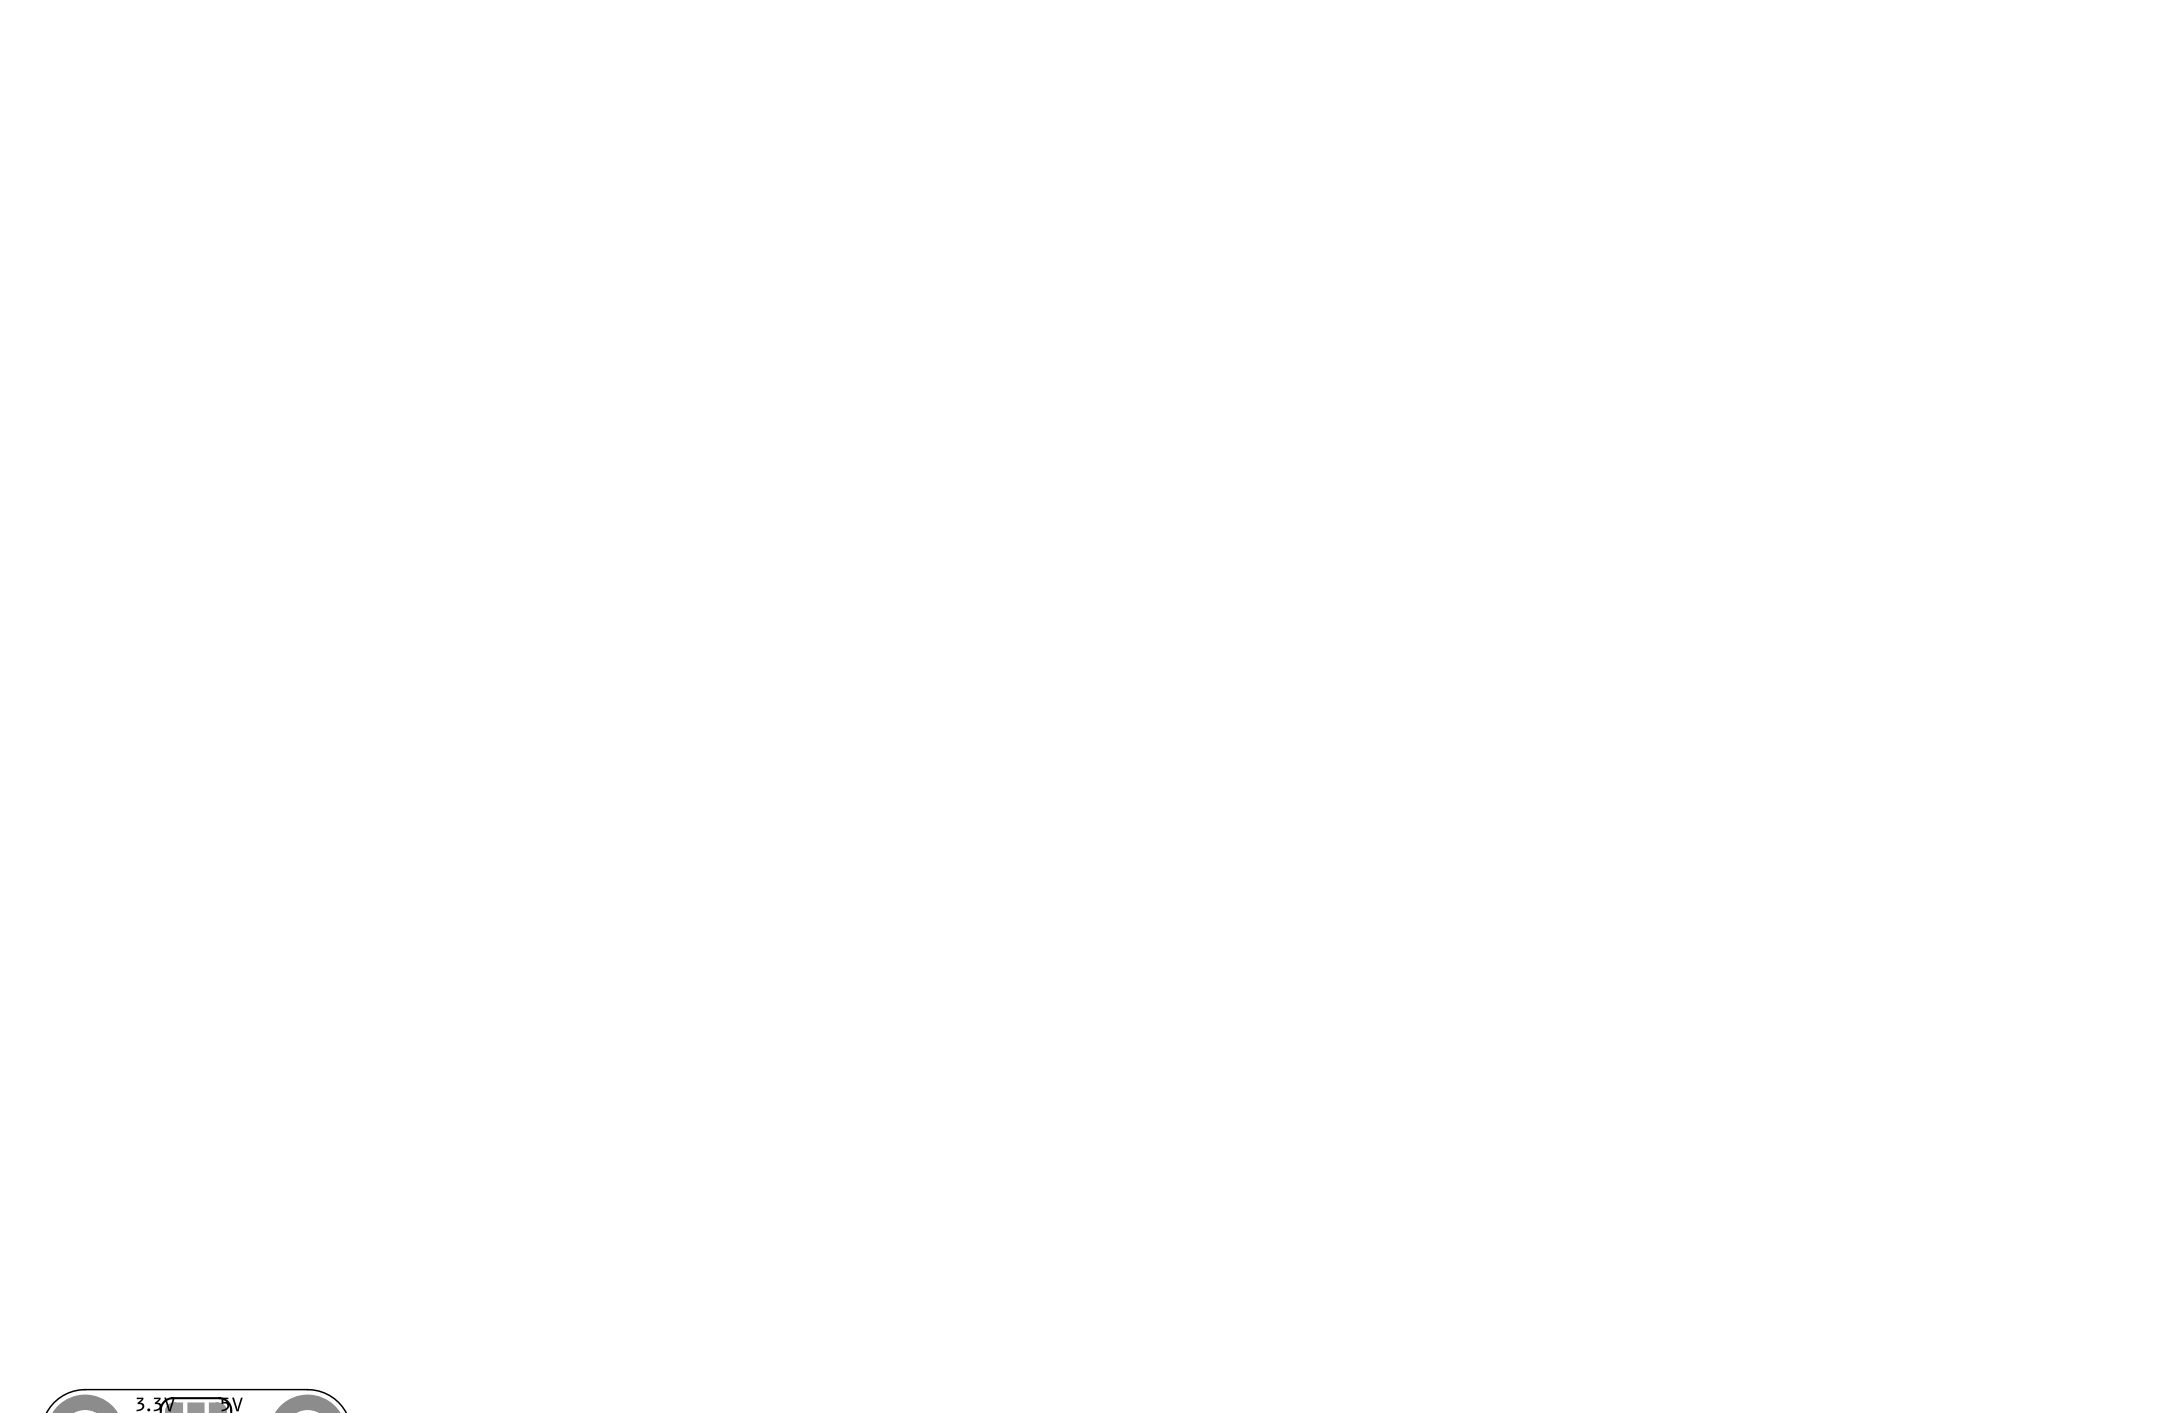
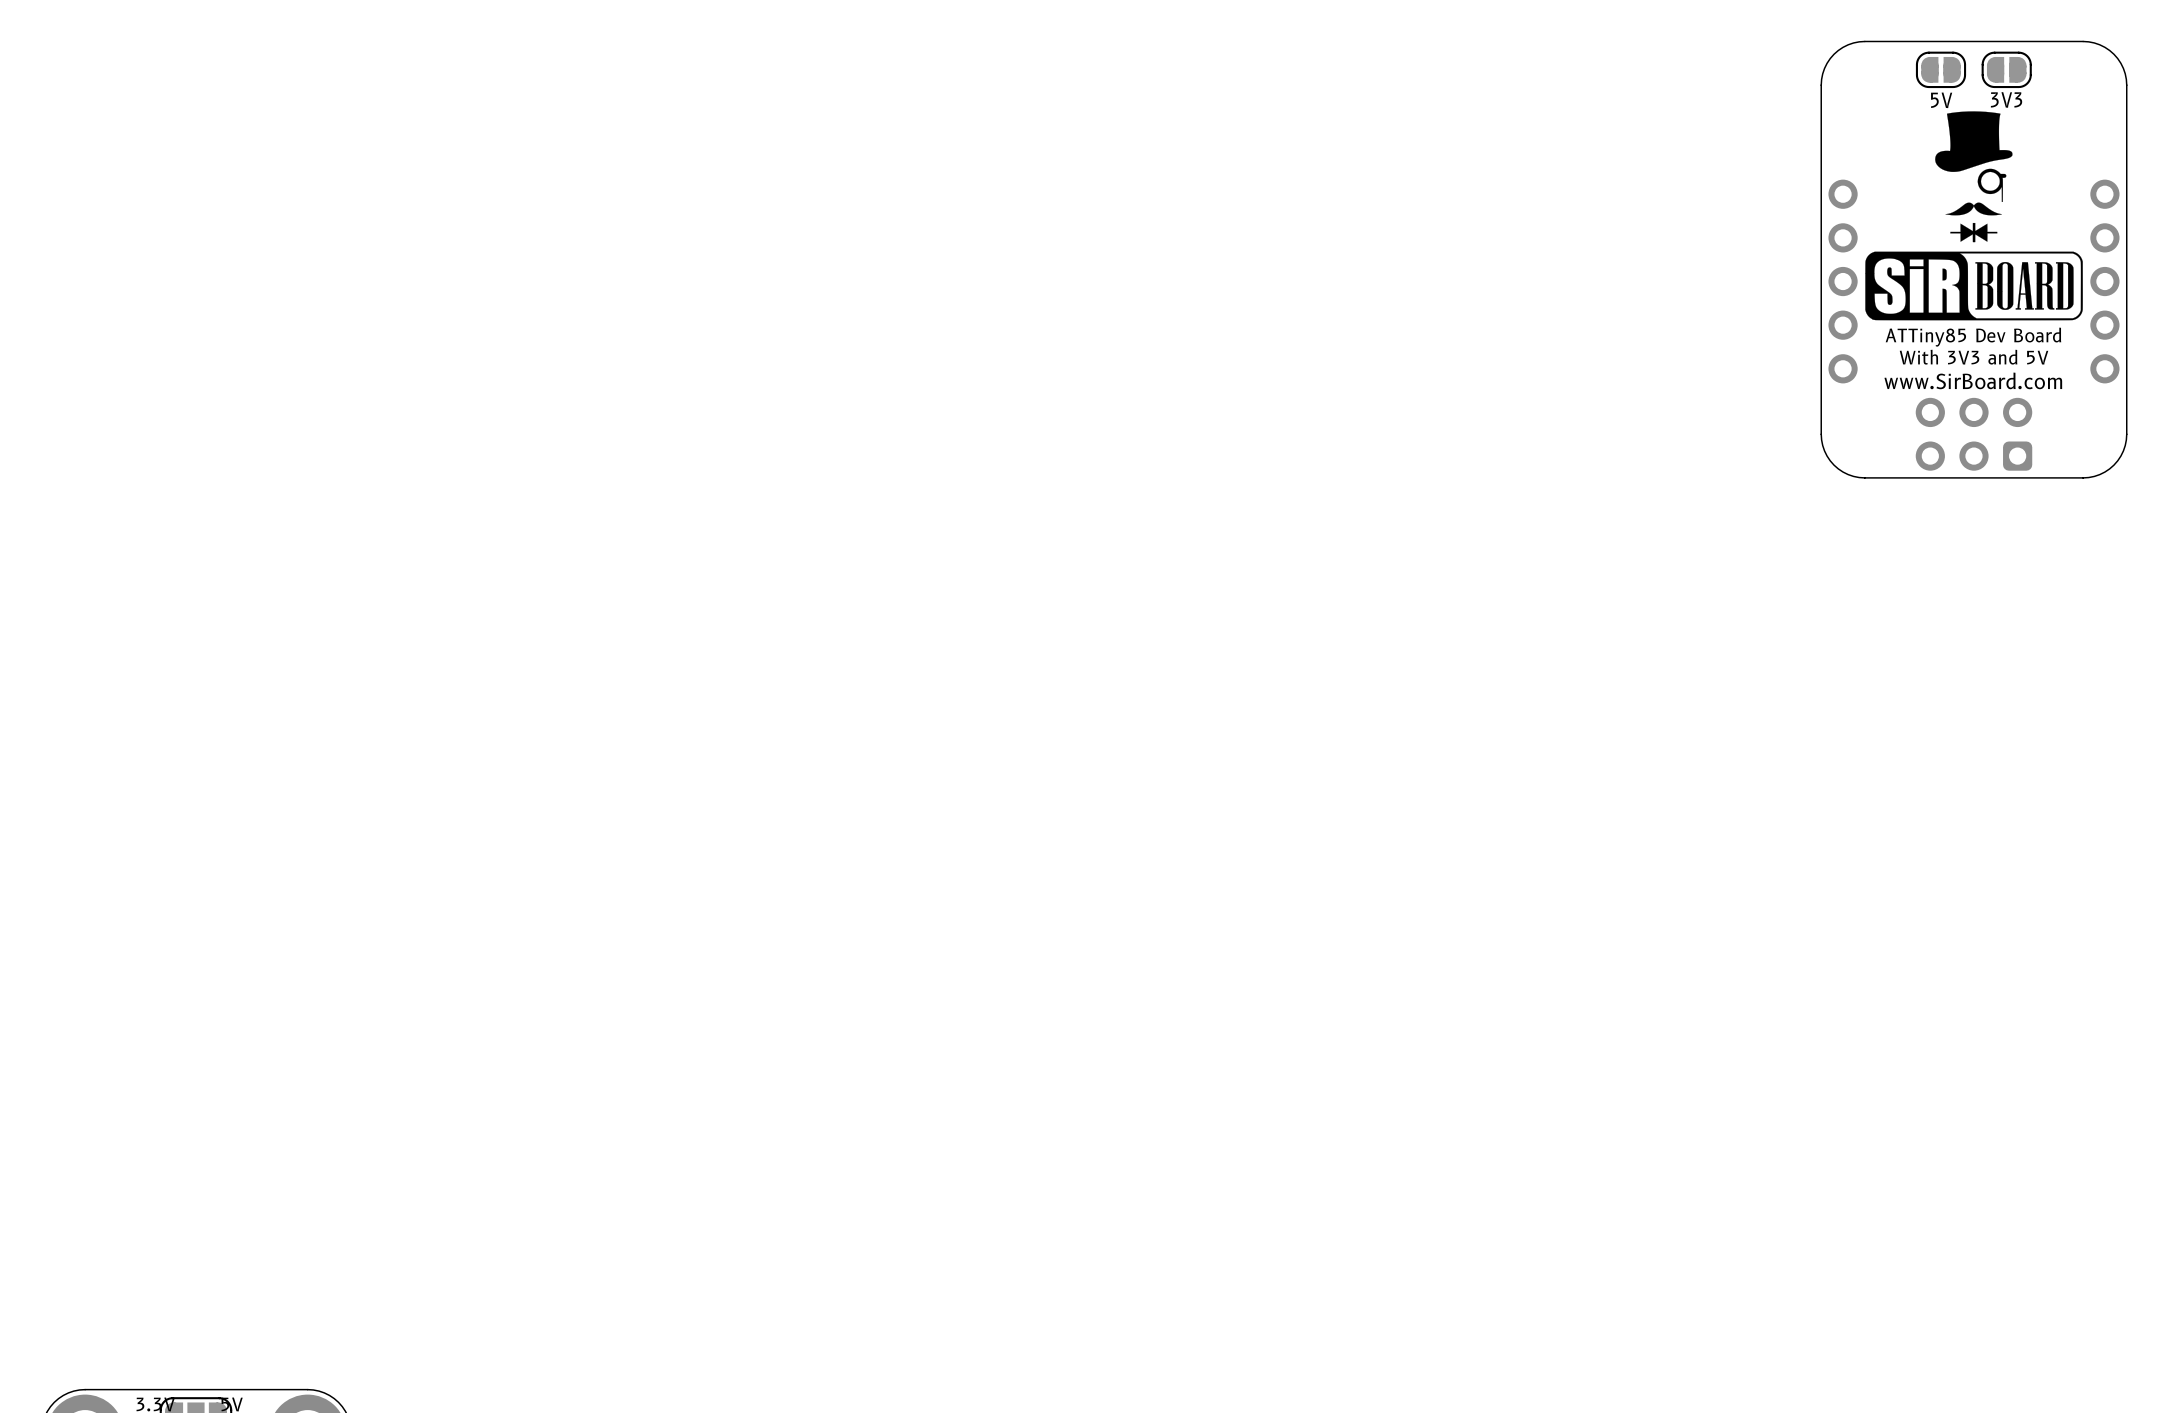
board edge: none -> (2083, 41) (1859, 41) (1838, 50) (1827, 63) (1821, 85) (1821, 434) (1827, 456) (1843, 472) (1864, 477) (2083, 477) (2104, 472) (2120, 456) (2126, 434) (2126, 79) (2120, 63) (2109, 50) (2094, 42) (2083, 41)
5V: none -> (1941, 69)
3V3: none -> (2006, 69)
drawing: none -> [1865, 111, 2083, 321]
part: none -> (1843, 281)
part: none -> (2104, 281)
text: none -> ATTiny85 Dev Board (1973, 337)
text: none -> With 3V3 and 5V (1974, 357)
text: none -> www.SirBoard.com (1973, 380)
part: none -> (1973, 434)

